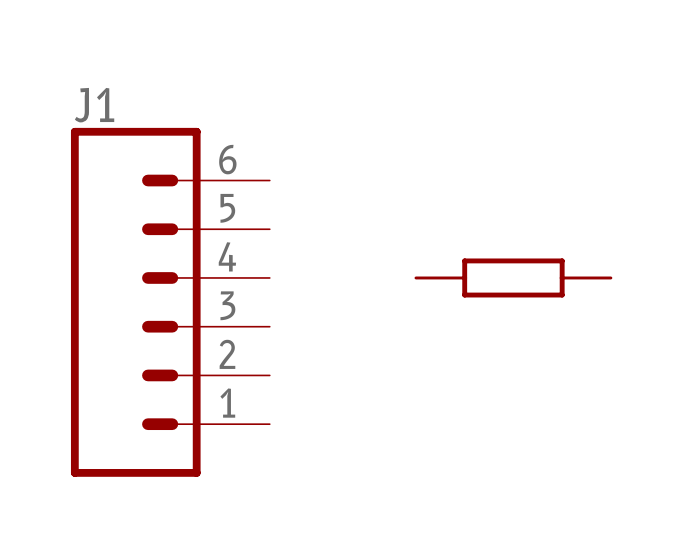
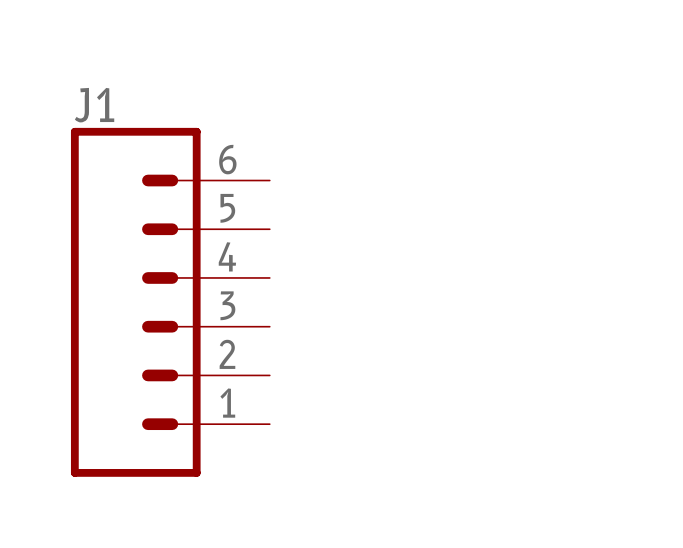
part: (513, 277) -> none

